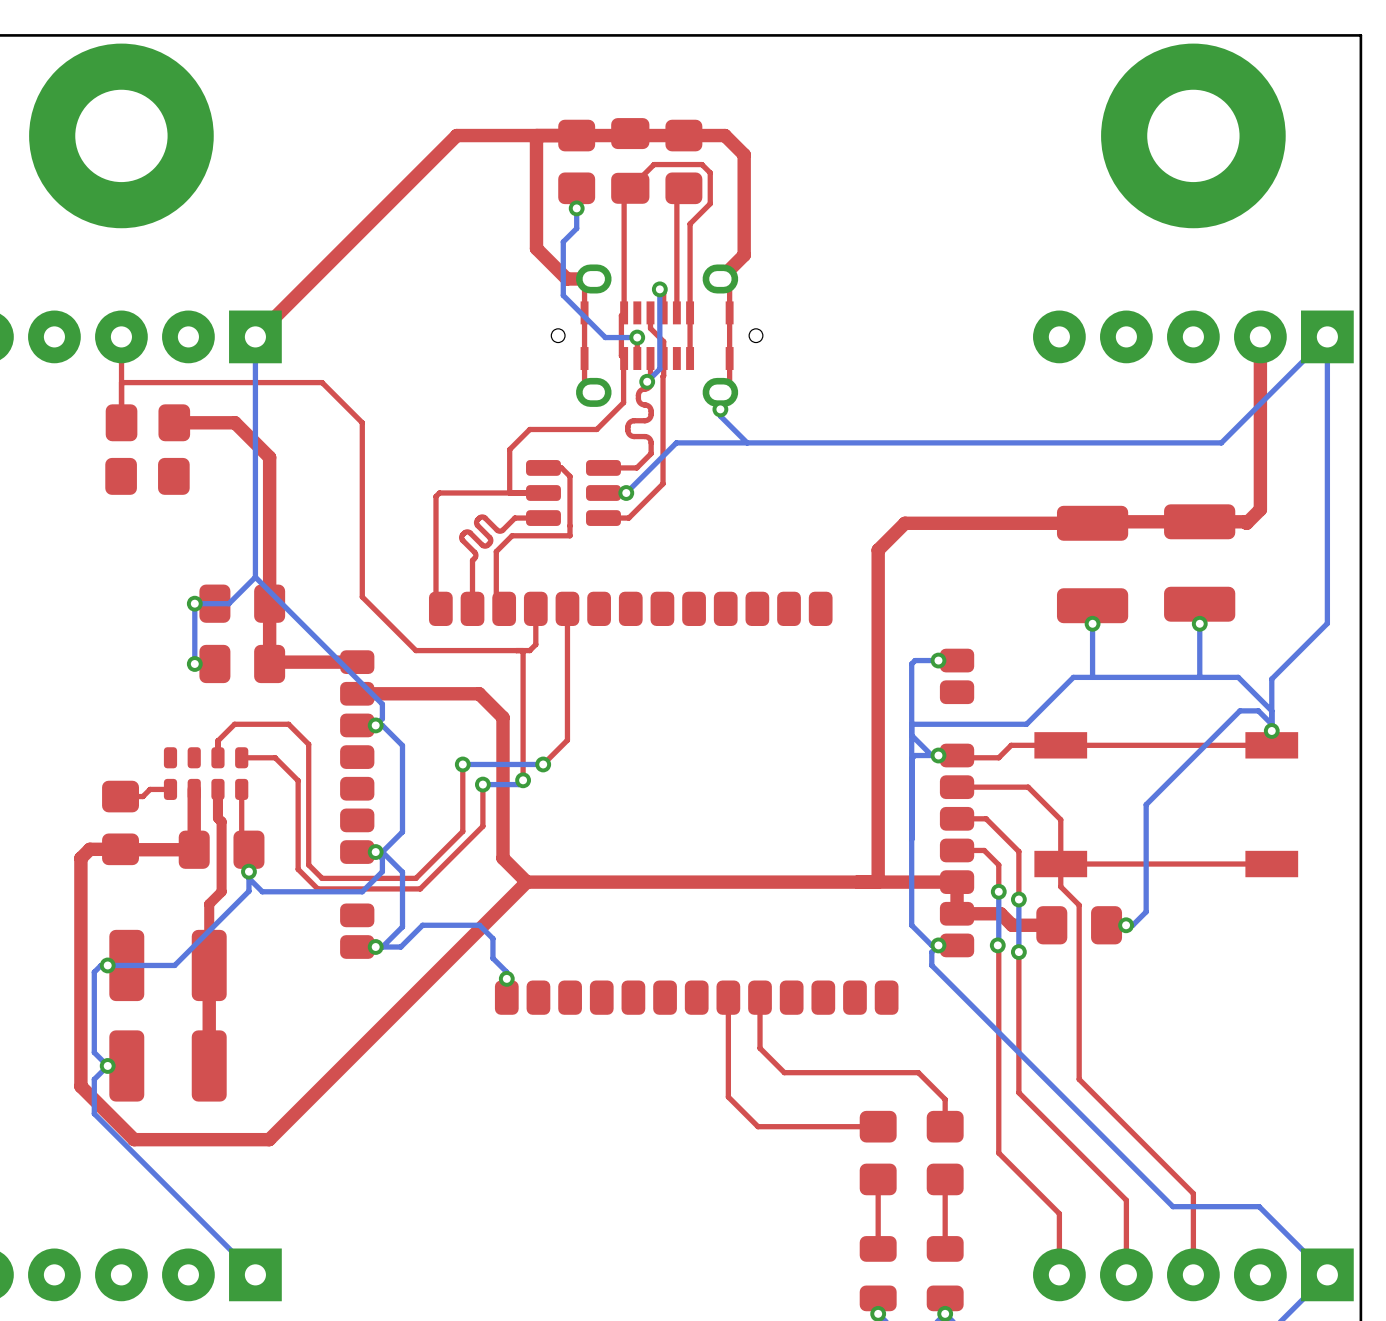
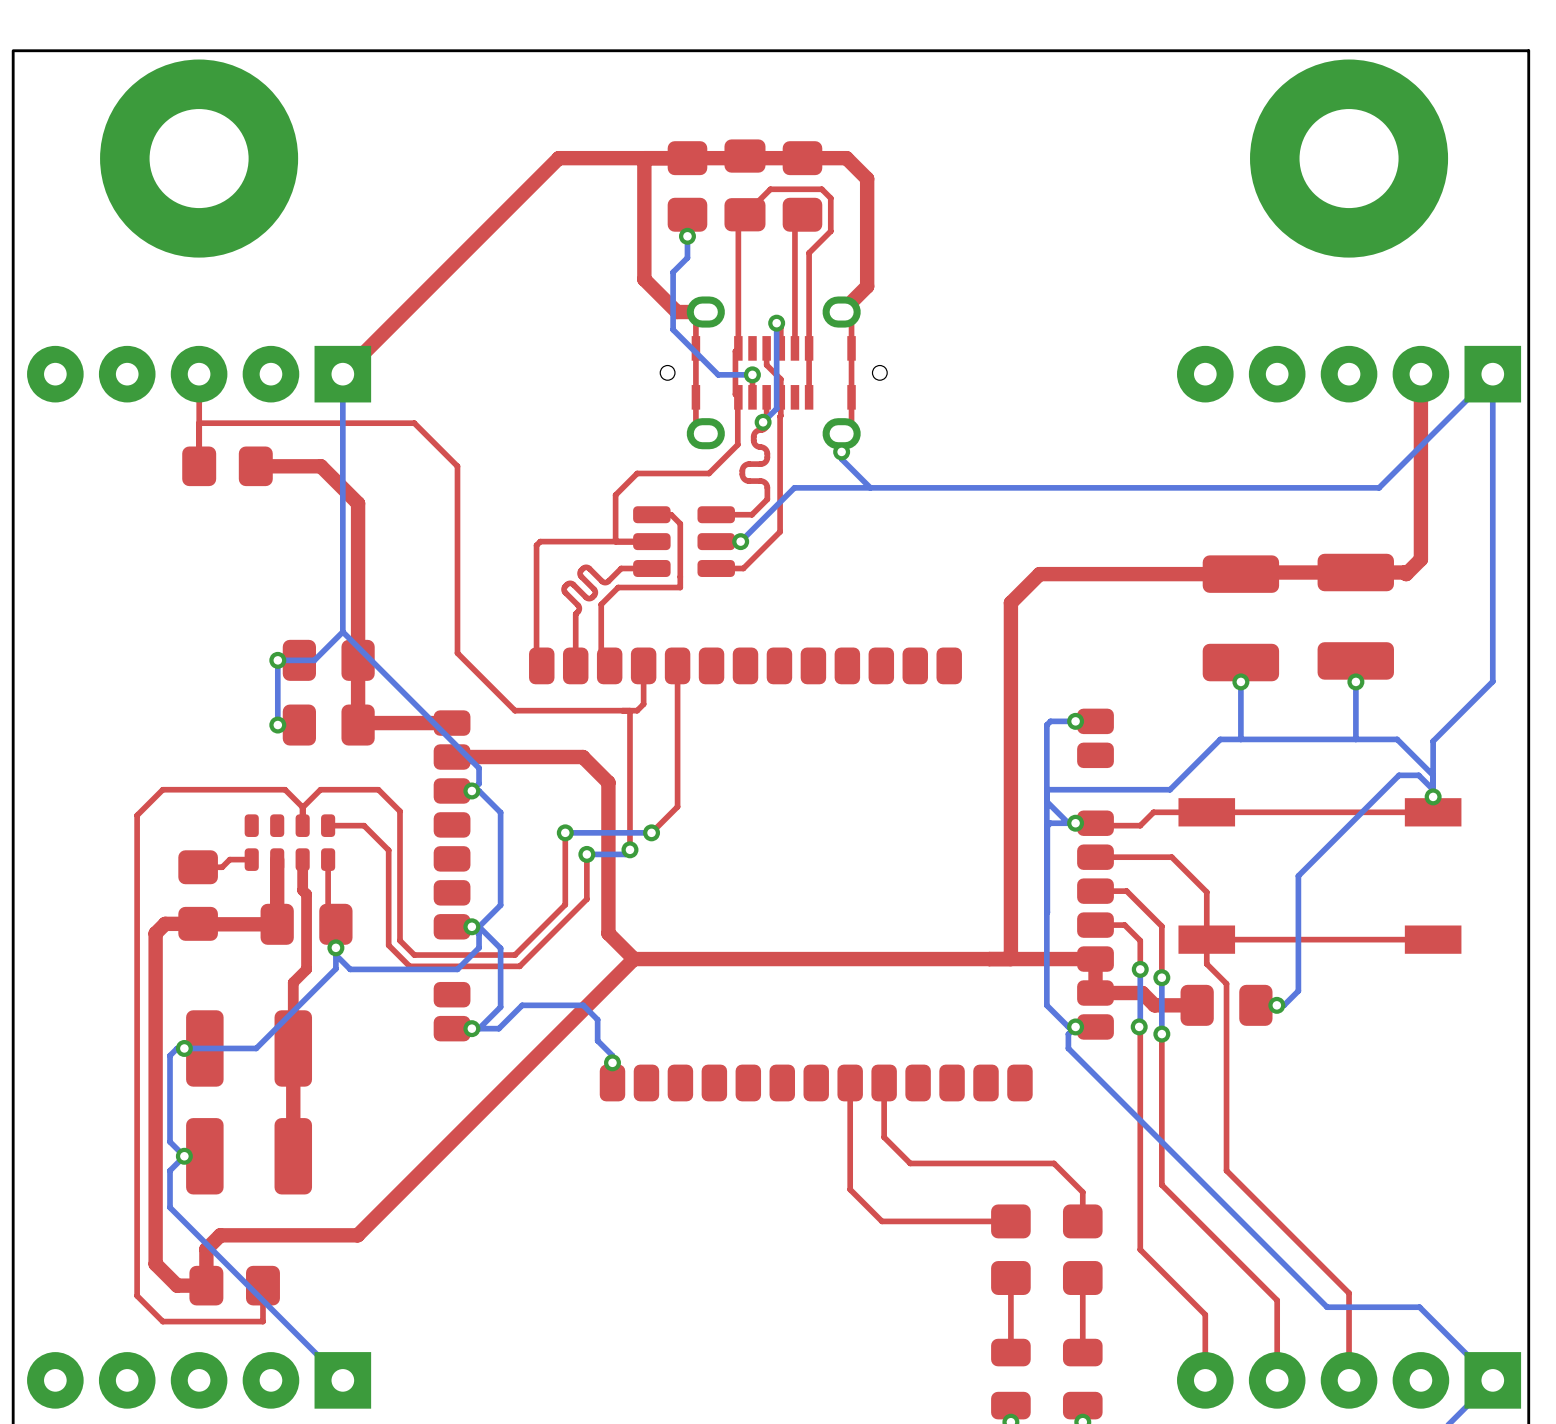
part: (147, 476) -> none
top track: none -> (302, 807) (285, 789) (162, 789) (137, 815) (137, 1295) (162, 1321) (262, 1321) (262, 1285)
top track: (80, 1086) (134, 1139) (141, 1139) -> (155, 1178) (155, 1264) (177, 1285) (206, 1285) (206, 1249) (220, 1235)
part: none -> (234, 1285)

